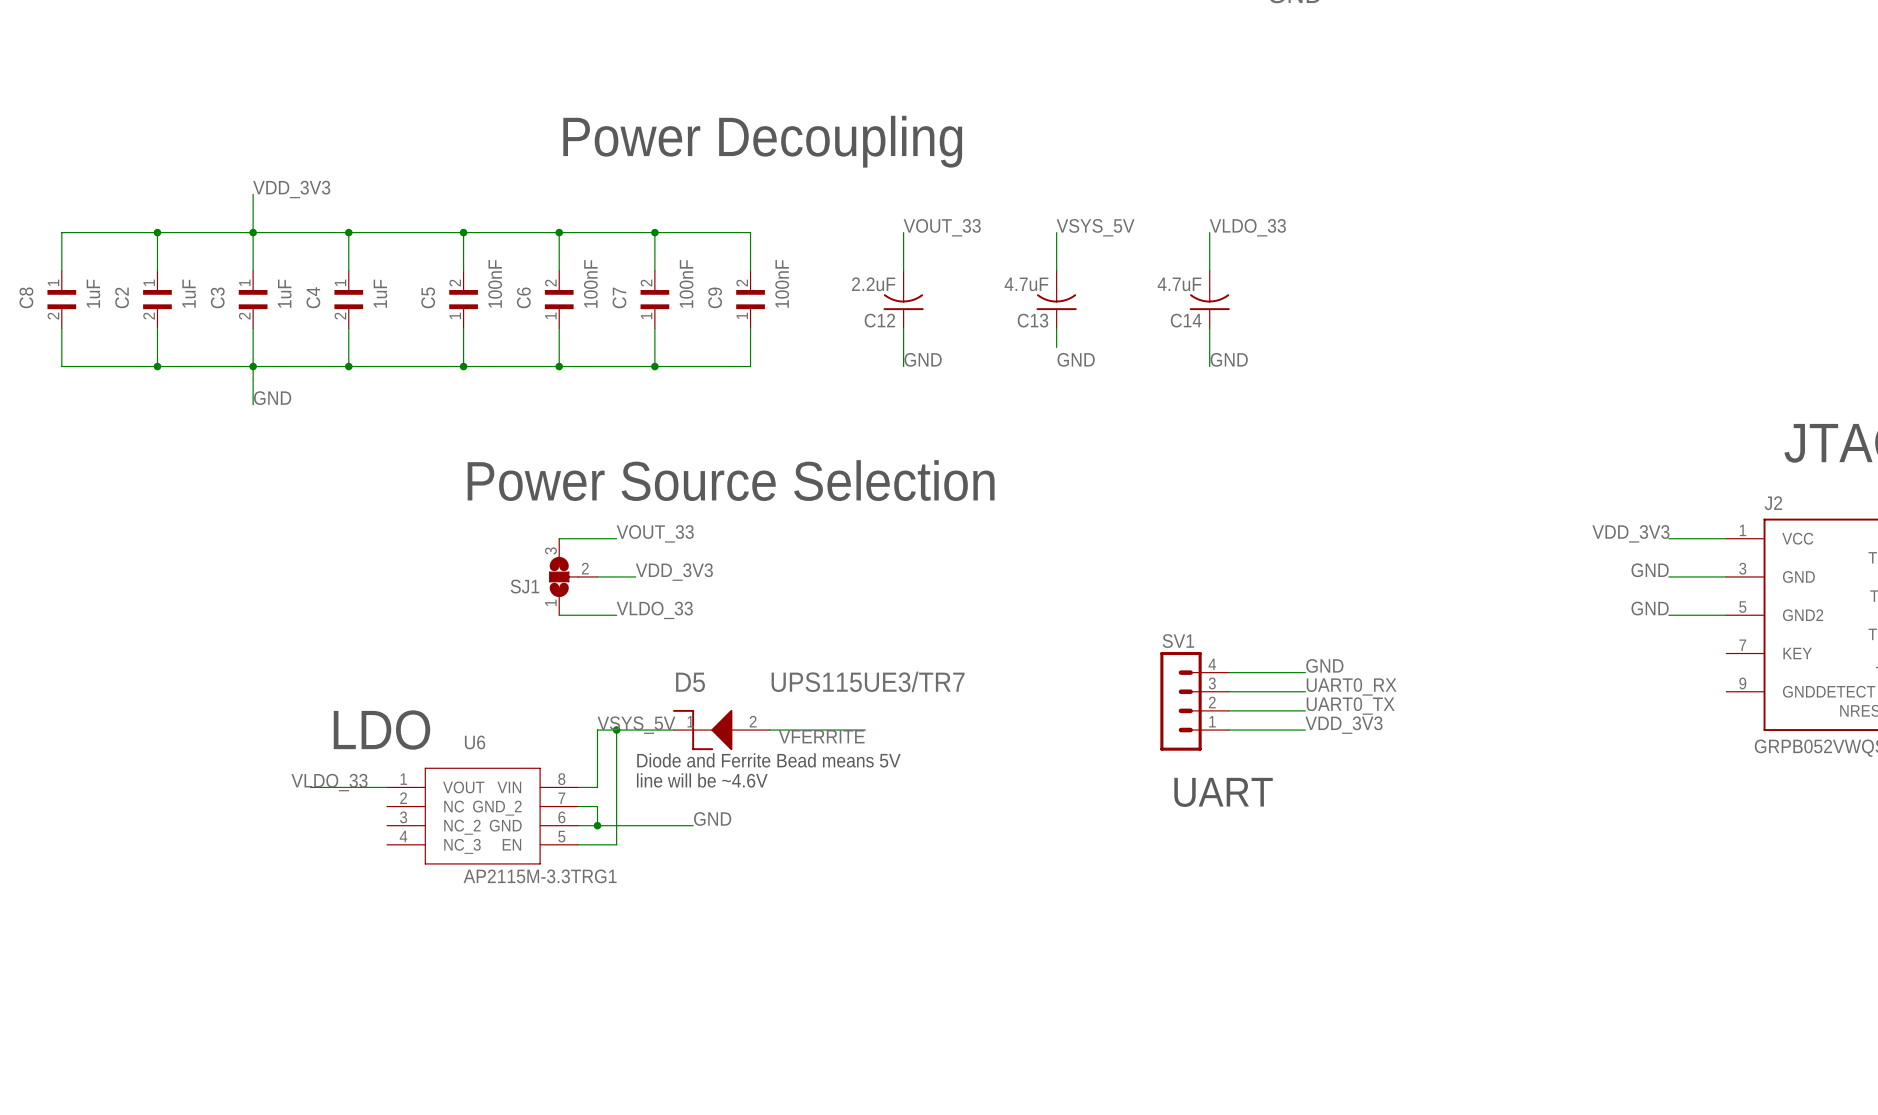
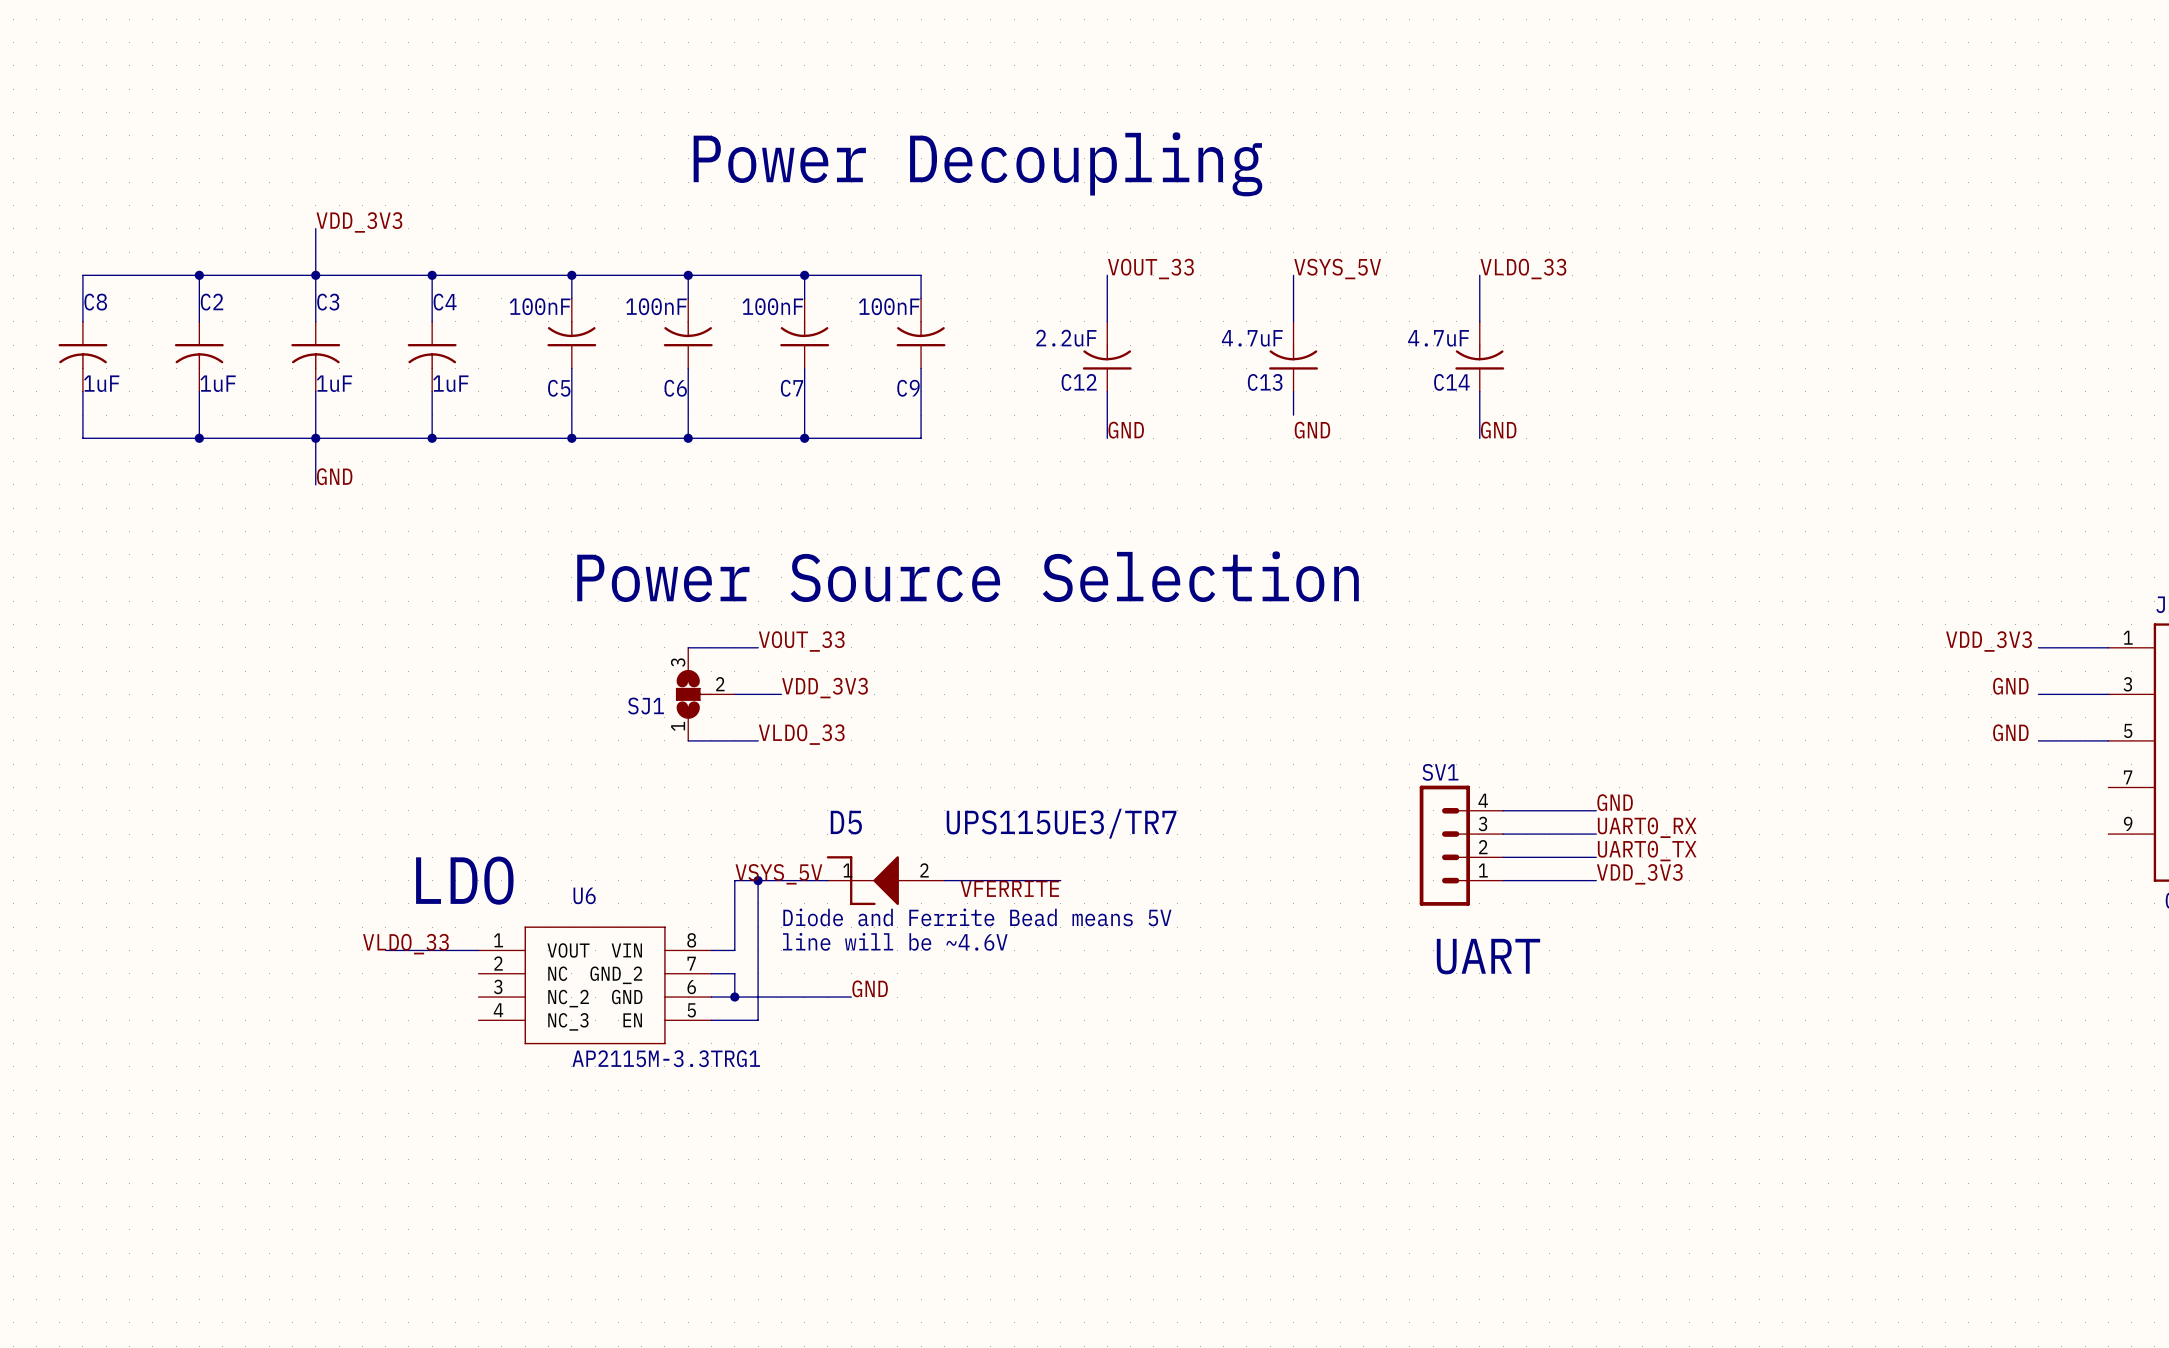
C8 symbol: [47, 270, 77, 329] -> [58, 321, 108, 392]
C2 symbol: [143, 270, 172, 329] -> [174, 321, 224, 392]
C3 symbol: [238, 270, 268, 329] -> [291, 321, 341, 392]
C4 symbol: [334, 270, 364, 329] -> [407, 321, 457, 392]
C5 symbol: [449, 270, 478, 329] -> [547, 298, 597, 369]
C6 symbol: [544, 270, 574, 329] -> [663, 298, 713, 369]
C7 symbol: [640, 270, 670, 329] -> [780, 298, 830, 369]
C9 symbol: [736, 270, 765, 329] -> [896, 298, 946, 369]
C5 value position: 100nF (495, 283) -> 100nF (540, 306)
C6 value position: 100nF (590, 283) -> 100nF (656, 306)
C7 value position: 100nF (686, 283) -> 100nF (772, 306)
C9 value position: 100nF (782, 283) -> 100nF (889, 306)
C8 value position: 1uF (93, 293) -> 1uF (101, 383)
C2 value position: 1uF (189, 293) -> 1uF (218, 383)
C3 value position: 1uF (284, 293) -> 1uF (334, 383)
C4 value position: 1uF (380, 293) -> 1uF (450, 383)
C8 name position: C8 (26, 297) -> C8 (95, 302)
C2 name position: C2 (122, 297) -> C2 (212, 302)
C3 name position: C3 (217, 297) -> C3 (328, 302)
C4 name position: C4 (313, 297) -> C4 (445, 302)
C5 name position: C5 (428, 297) -> C5 (559, 388)
C6 name position: C6 (523, 297) -> C6 (675, 388)
C7 name position: C7 (619, 297) -> C7 (792, 388)
C9 name position: C9 (715, 297) -> C9 (908, 388)

